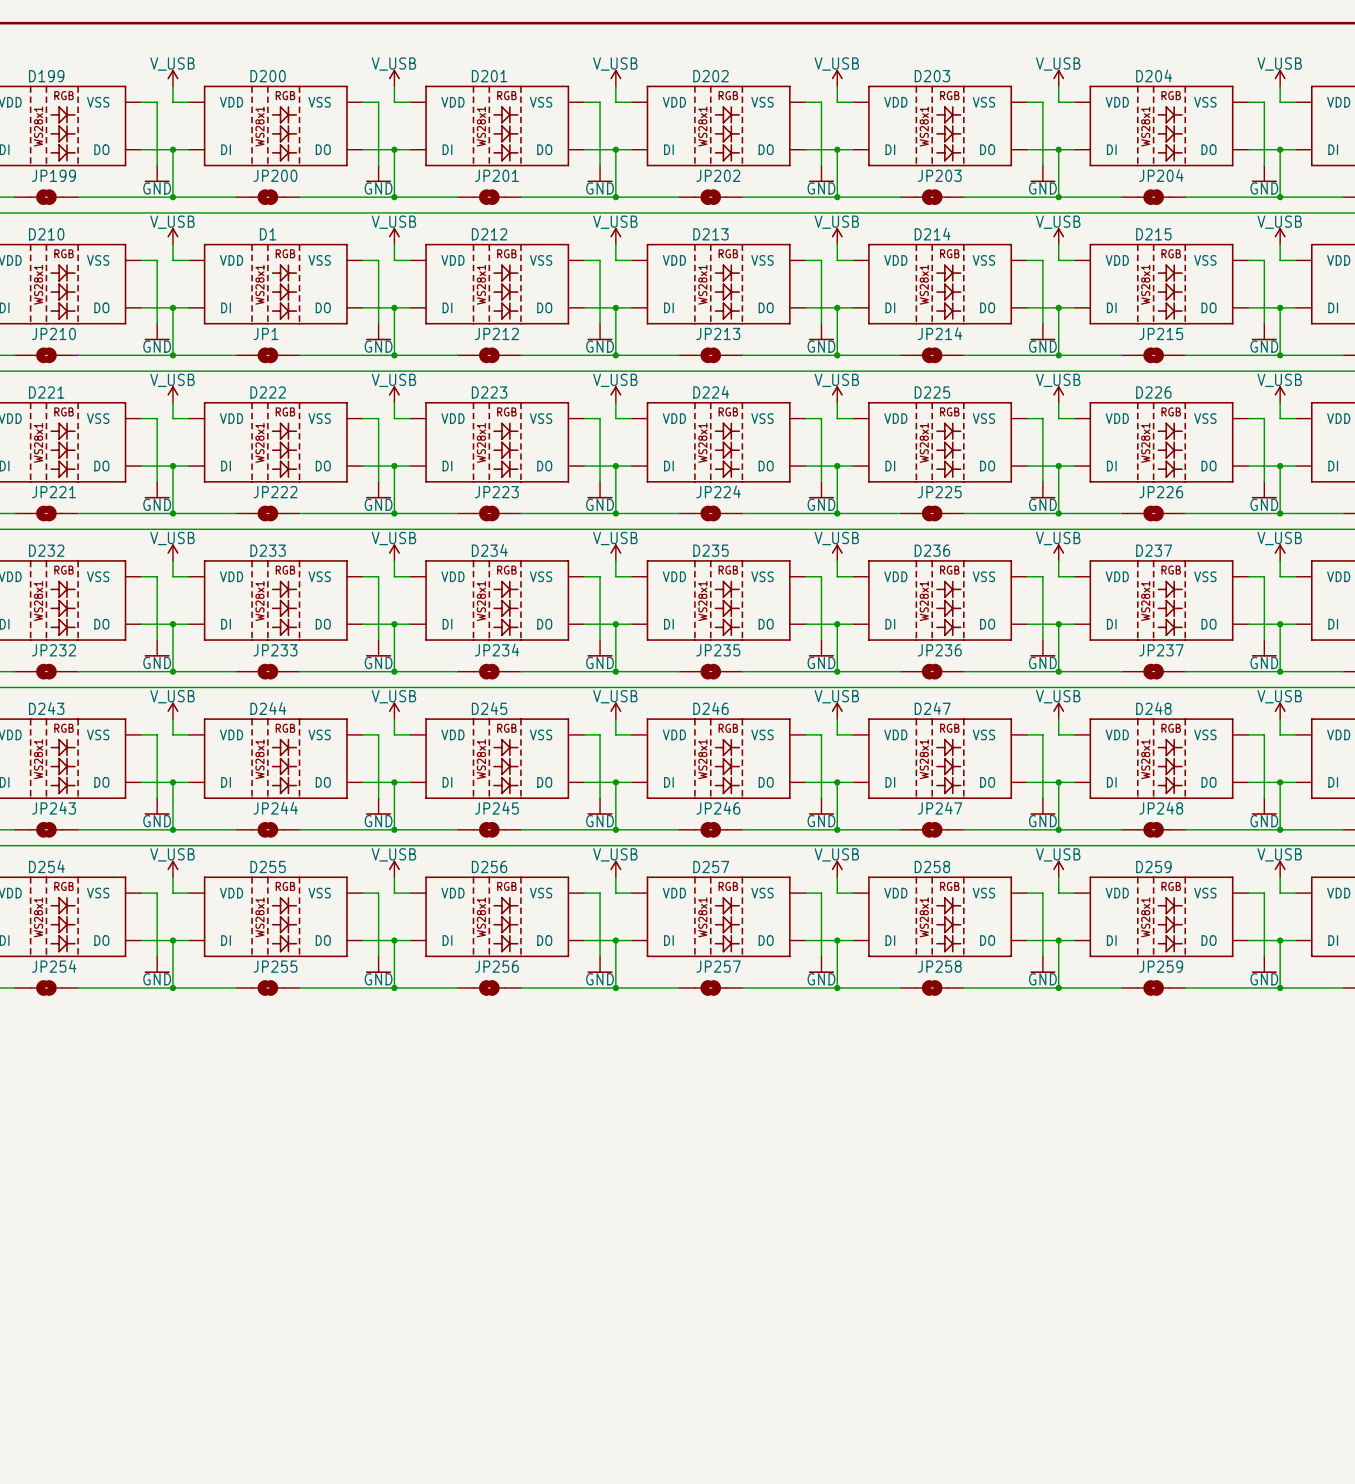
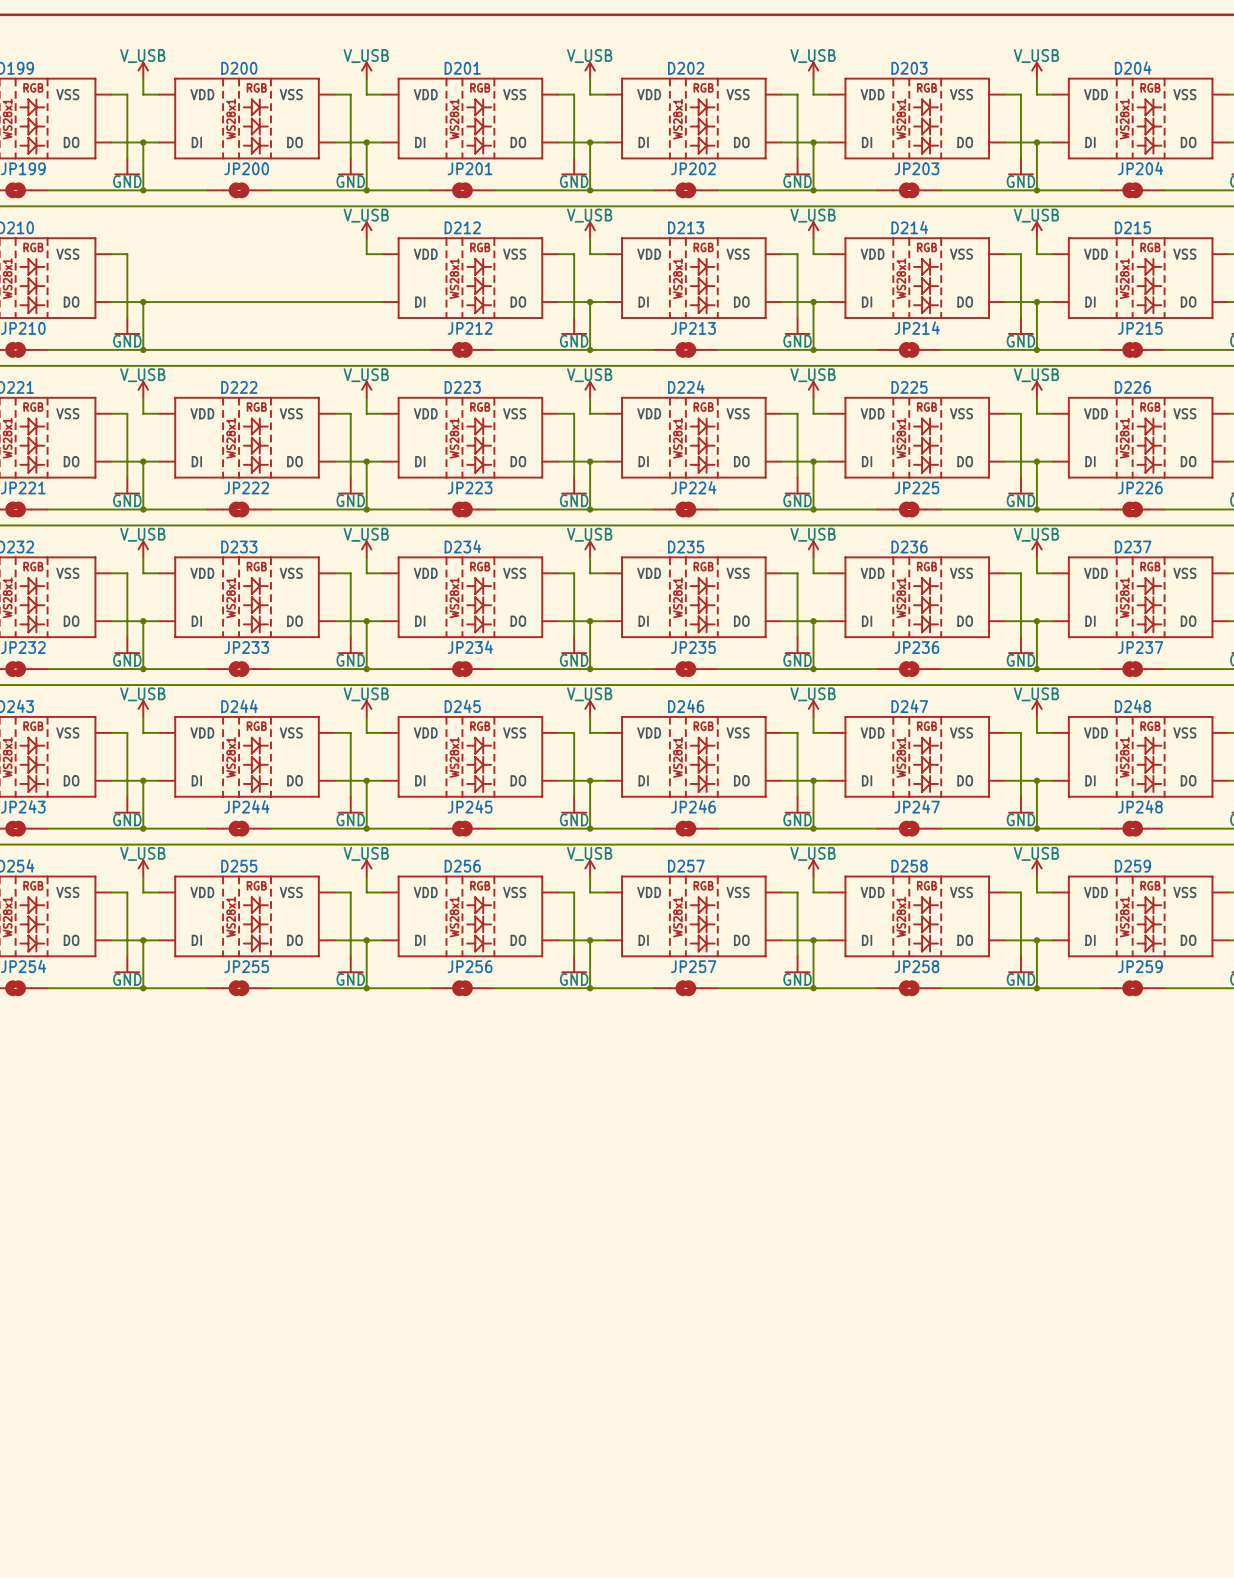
power symbol: V_USB (172, 236) -> none
wire: (172, 244) (172, 260) (188, 260) -> none
wire: (362, 260) (378, 260) (378, 323) -> none
D1: (275, 284) -> none
wire: none -> (159, 302) (334, 302)
wire: (394, 307) (394, 355) -> none
junction: (394, 307) -> none
power symbol: GND (378, 331) -> none
JP1: (267, 355) -> none
junction: (394, 355) -> none

